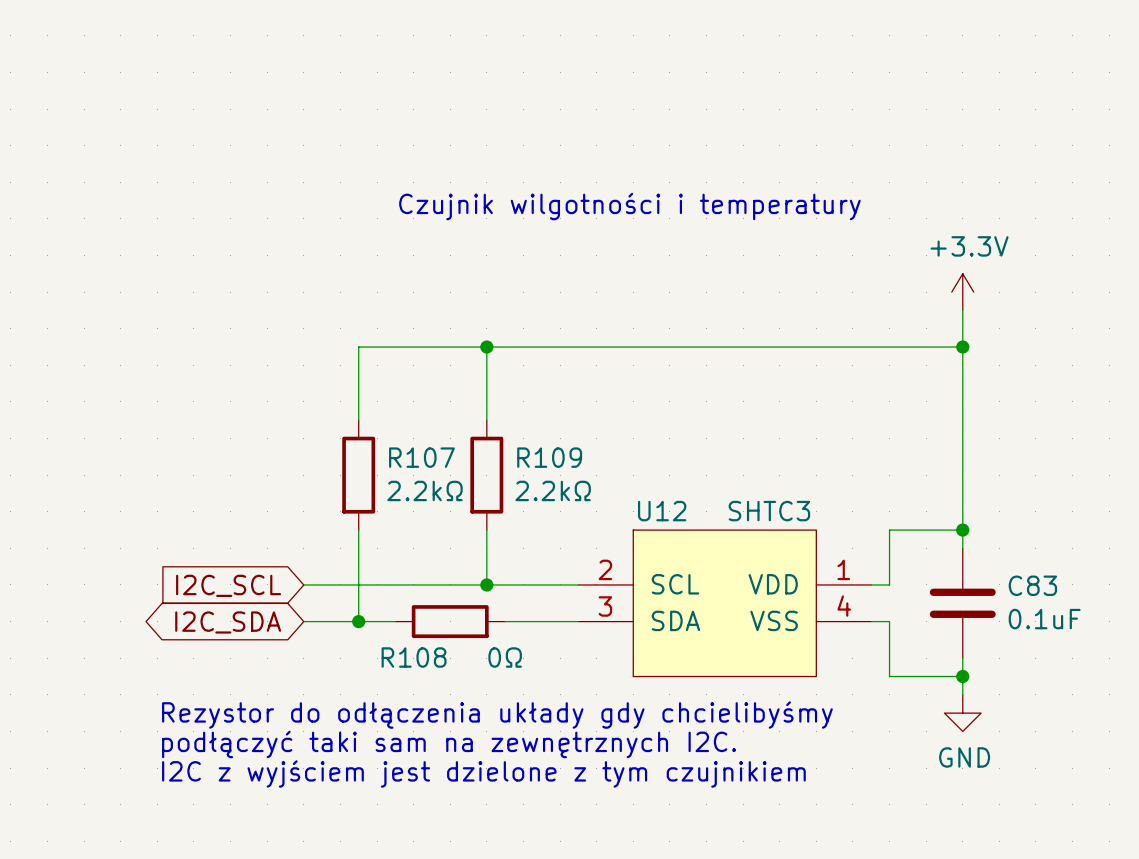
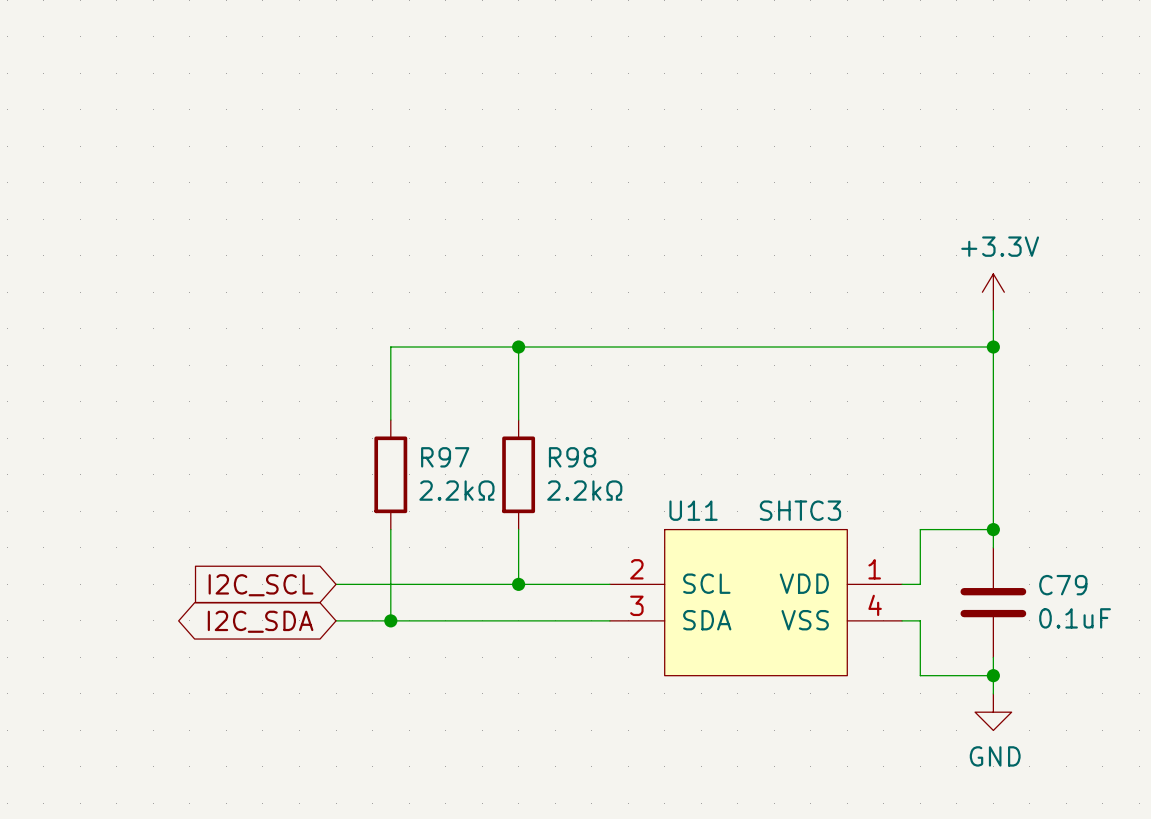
text: Czujnik wilgotności i temperatury (629, 206) -> none
R107 name: R107 (421, 457) -> R97 (445, 457)
R109 name: R109 (549, 457) -> R98 (572, 457)
U12 name: U12 (662, 511) -> U11 (693, 510)
C83 name: C83 (1032, 585) -> C79 (1063, 585)
wire: none -> (427, 620) (536, 620)
R108: 0Ω (450, 621) -> none
text: Rezystor do odłączenia układy gdy chcielibyśmy (497, 715) -> none
text: podłączyć taki sam na zewnętrznych I2C. (449, 744) -> none
text: I2C z wyjściem jest dzielone z tym czujnikiem (483, 773) -> none

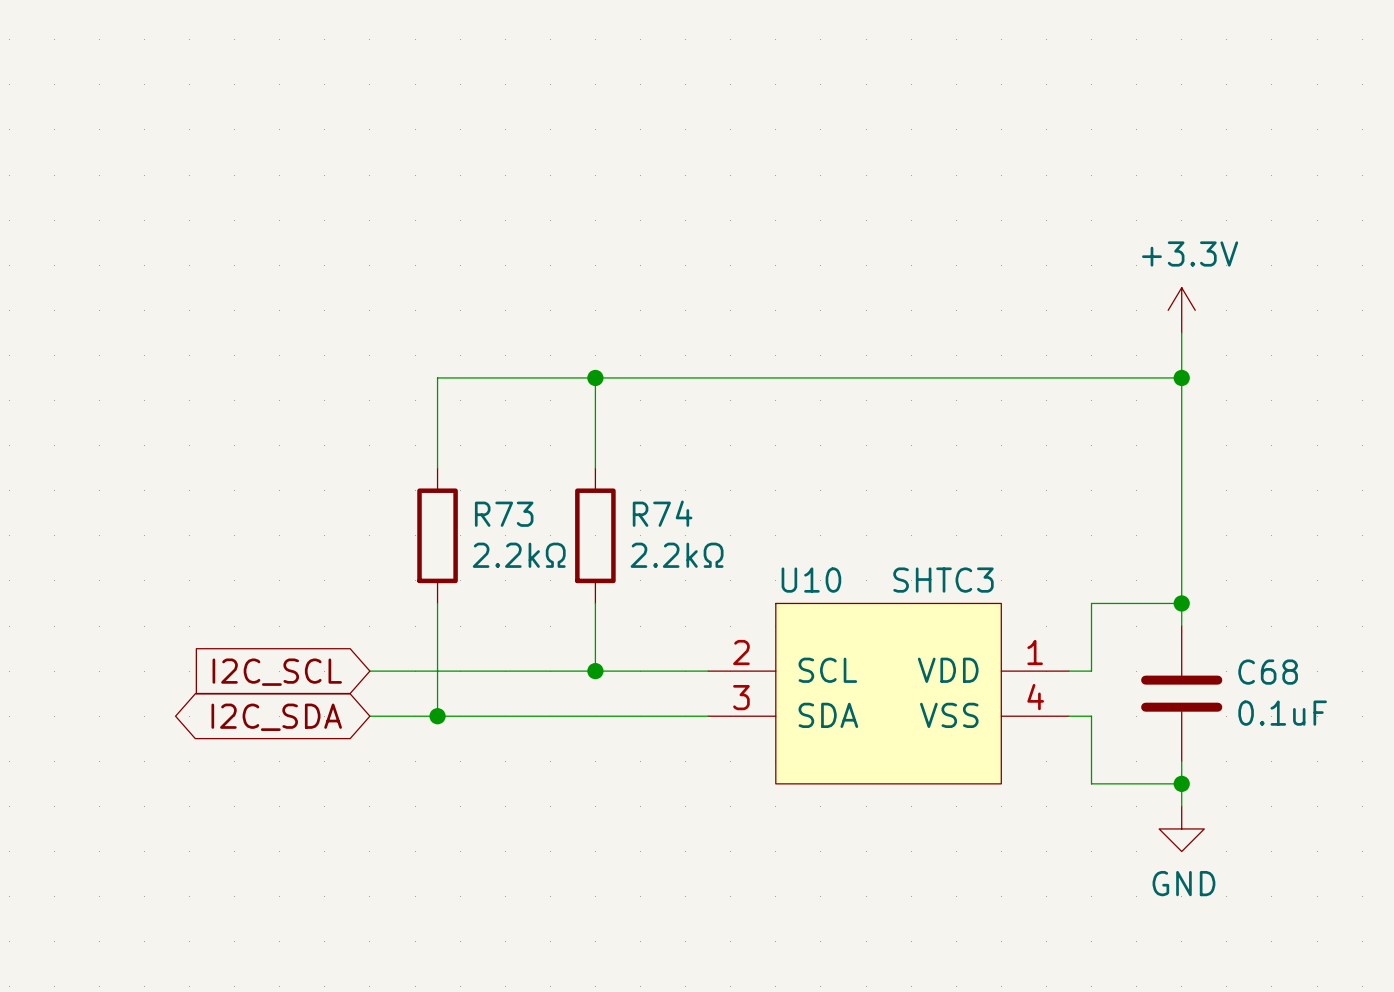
R97 name: R97 (445, 457) -> R73 (504, 514)
R98 name: R98 (572, 457) -> R74 (662, 513)
U11 name: U11 (693, 510) -> U10 (811, 580)
C79 name: C79 (1063, 585) -> C68 (1268, 672)

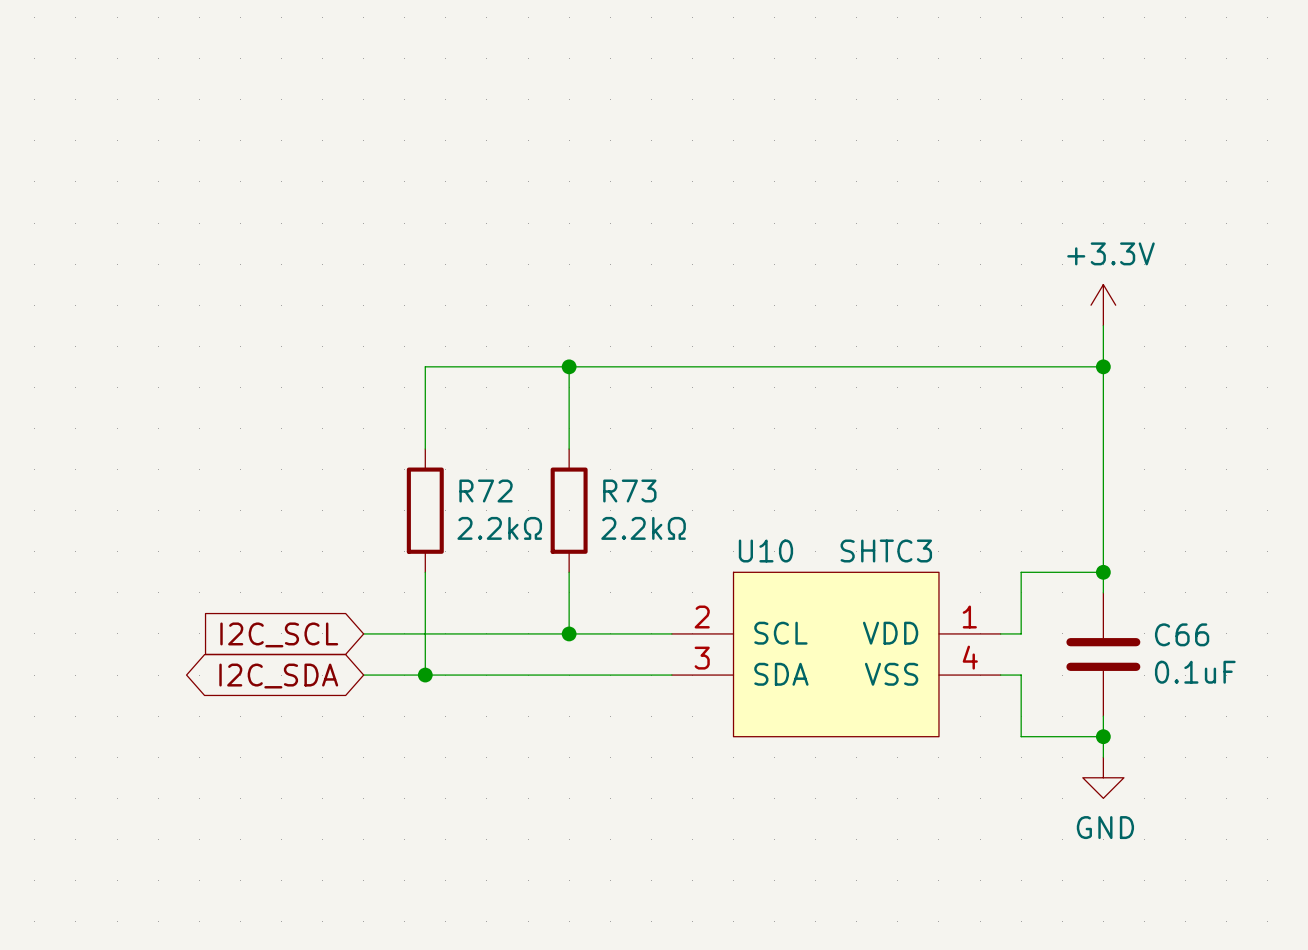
R74 name: R74 (662, 513) -> R73 (629, 491)
R73 name: R73 (504, 514) -> R72 (486, 491)
C68 name: C68 (1268, 672) -> C66 (1182, 634)

